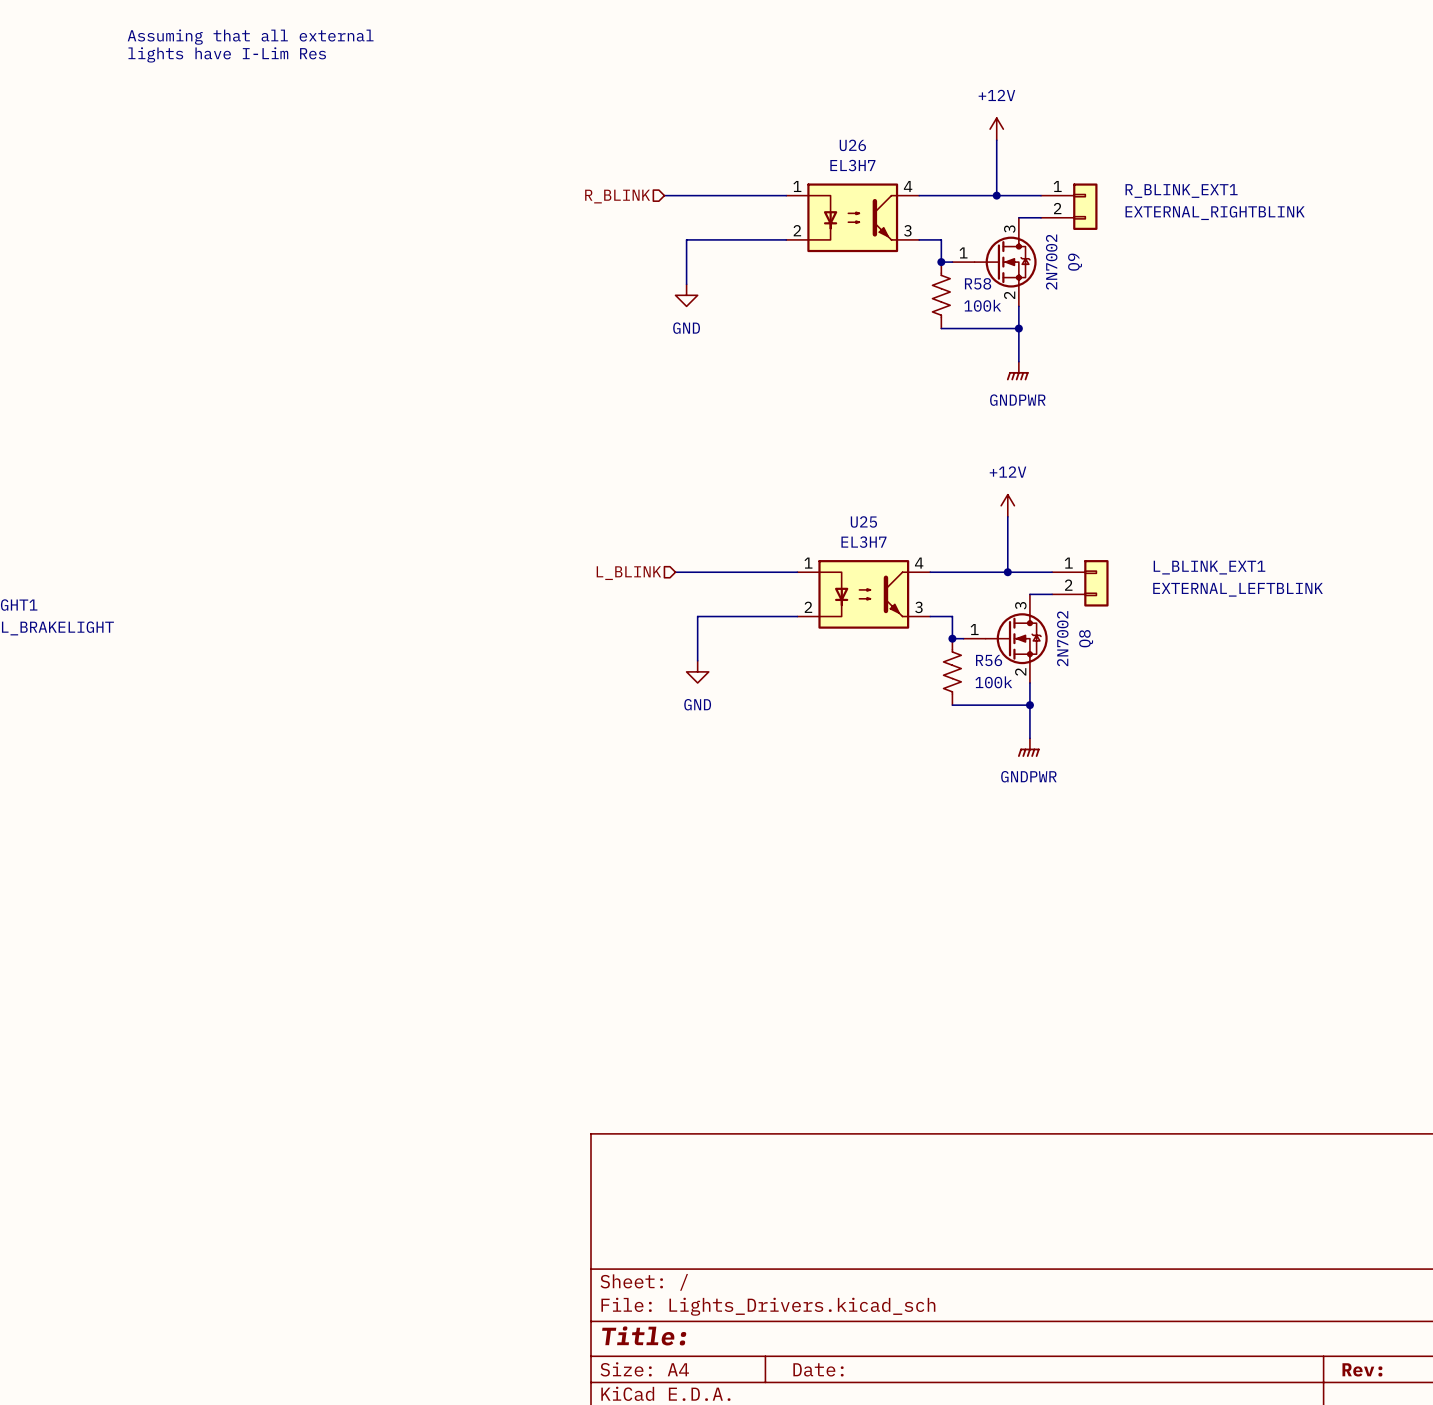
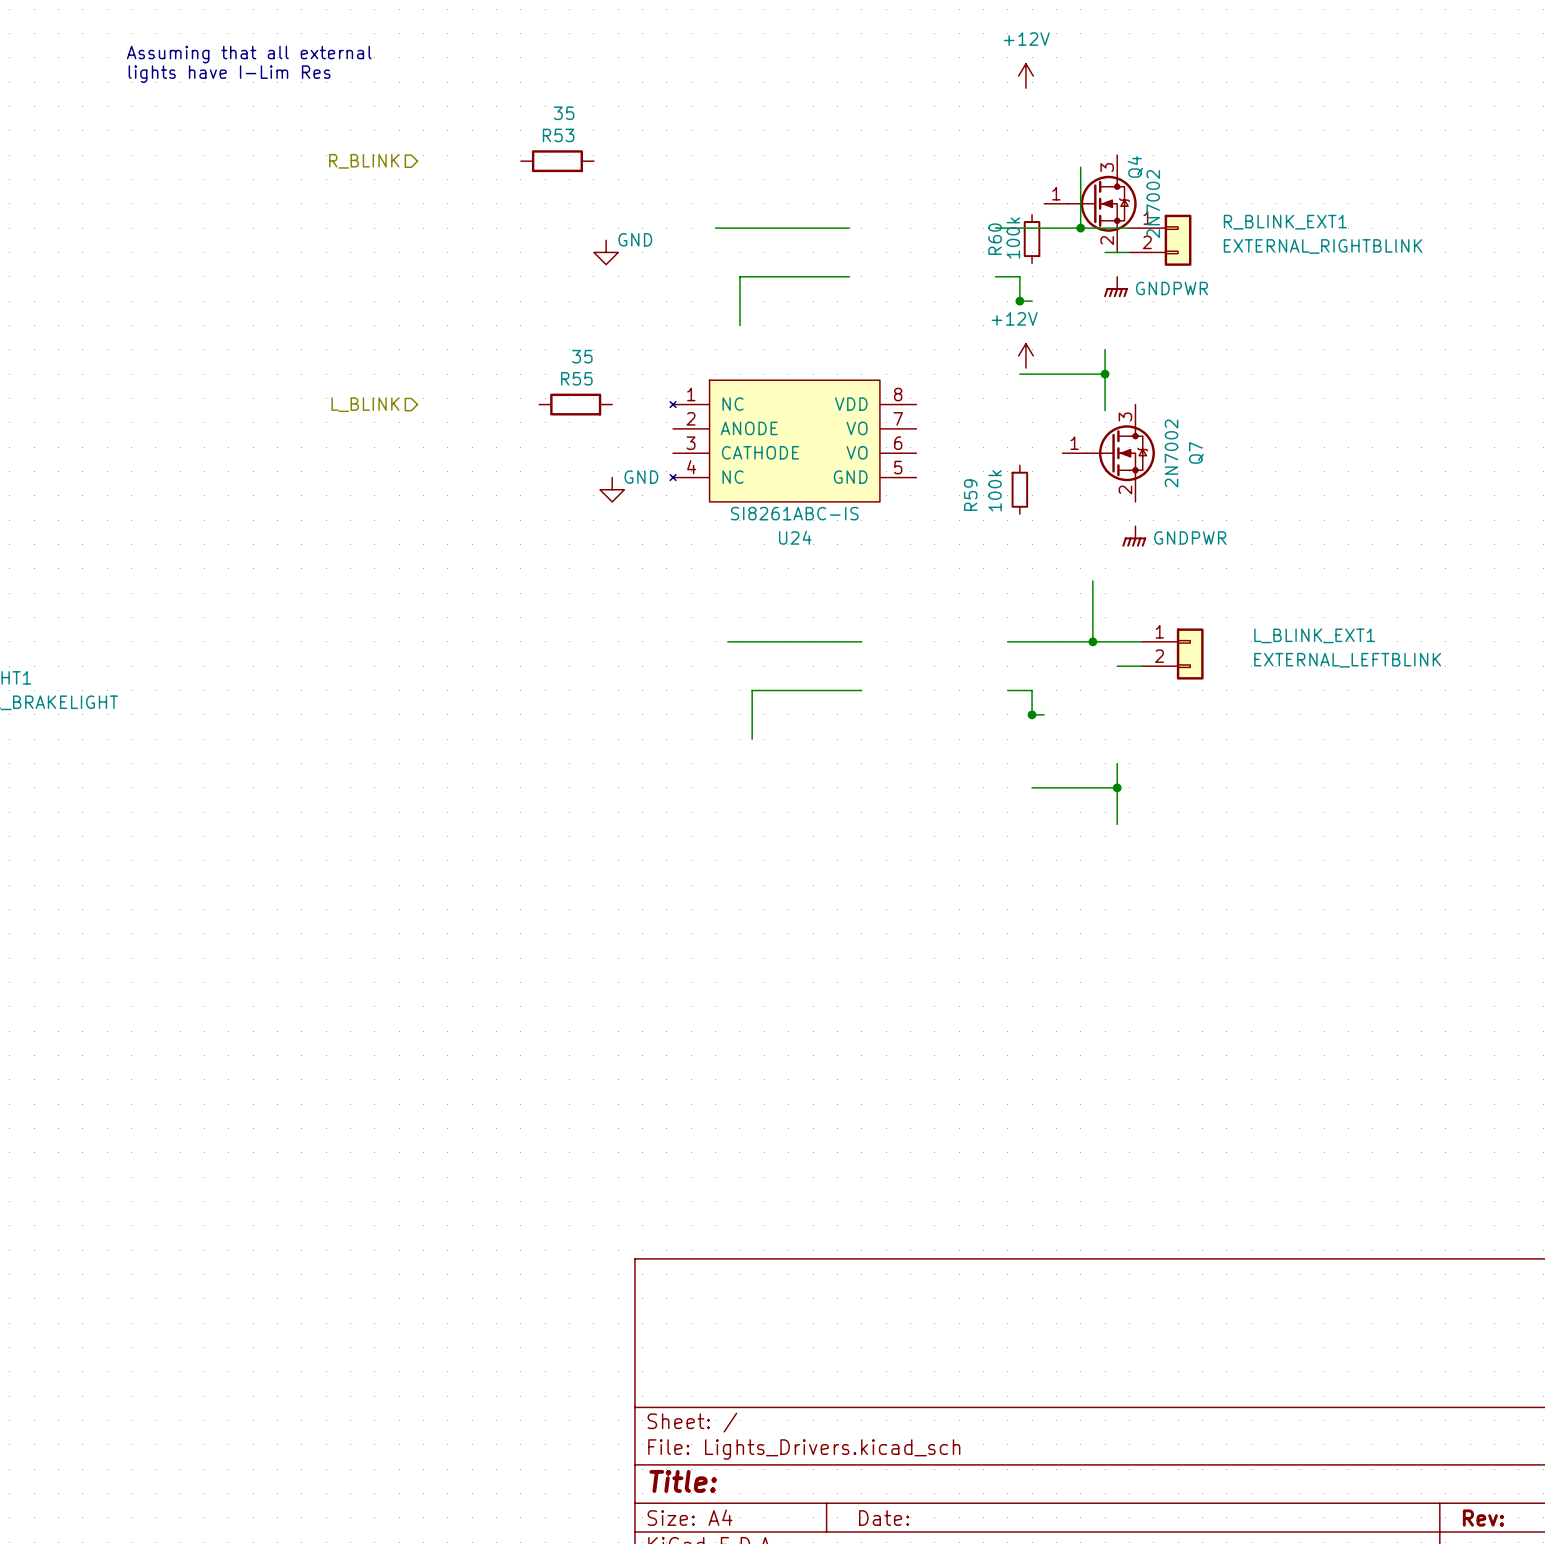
power symbol position: +12V (996, 129) -> +12V (1025, 76)
R53: none -> 35 (557, 161)
hierarchical label: none -> R_BLINK (364, 161)
Q4: none -> 2N7002 (1090, 203)
hierarchical label: R_BLINK (617, 196) -> none
R60: none -> 100k (1032, 239)
power symbol: none -> GND (606, 252)
U26: EL3H7 (852, 217) -> none
power symbol: none -> GNDPWR (1115, 287)
Q9: 2N7002 (994, 262) -> none
power symbol: GND (686, 295) -> none
R58: 100k (941, 295) -> none
power symbol: none -> +12V (1025, 355)
R55: none -> 35 (575, 404)
hierarchical label: none -> L_BLINK (365, 404)
power symbol: GNDPWR (1017, 371) -> none
U24: none -> SI8261ABC-IS (793, 441)
Q7: none -> 2N7002 (1108, 453)
power symbol: none -> GND (612, 489)
R59: none -> 100k (1019, 489)
power symbol: none -> GNDPWR (1134, 536)
power symbol: +12V (1007, 505) -> none
hierarchical label: L_BLINK (628, 573) -> none
U25: EL3H7 (863, 594) -> none
Q8: 2N7002 (1005, 638) -> none
power symbol: GND (697, 671) -> none
R56: 100k (952, 671) -> none
power symbol: GNDPWR (1028, 747) -> none

